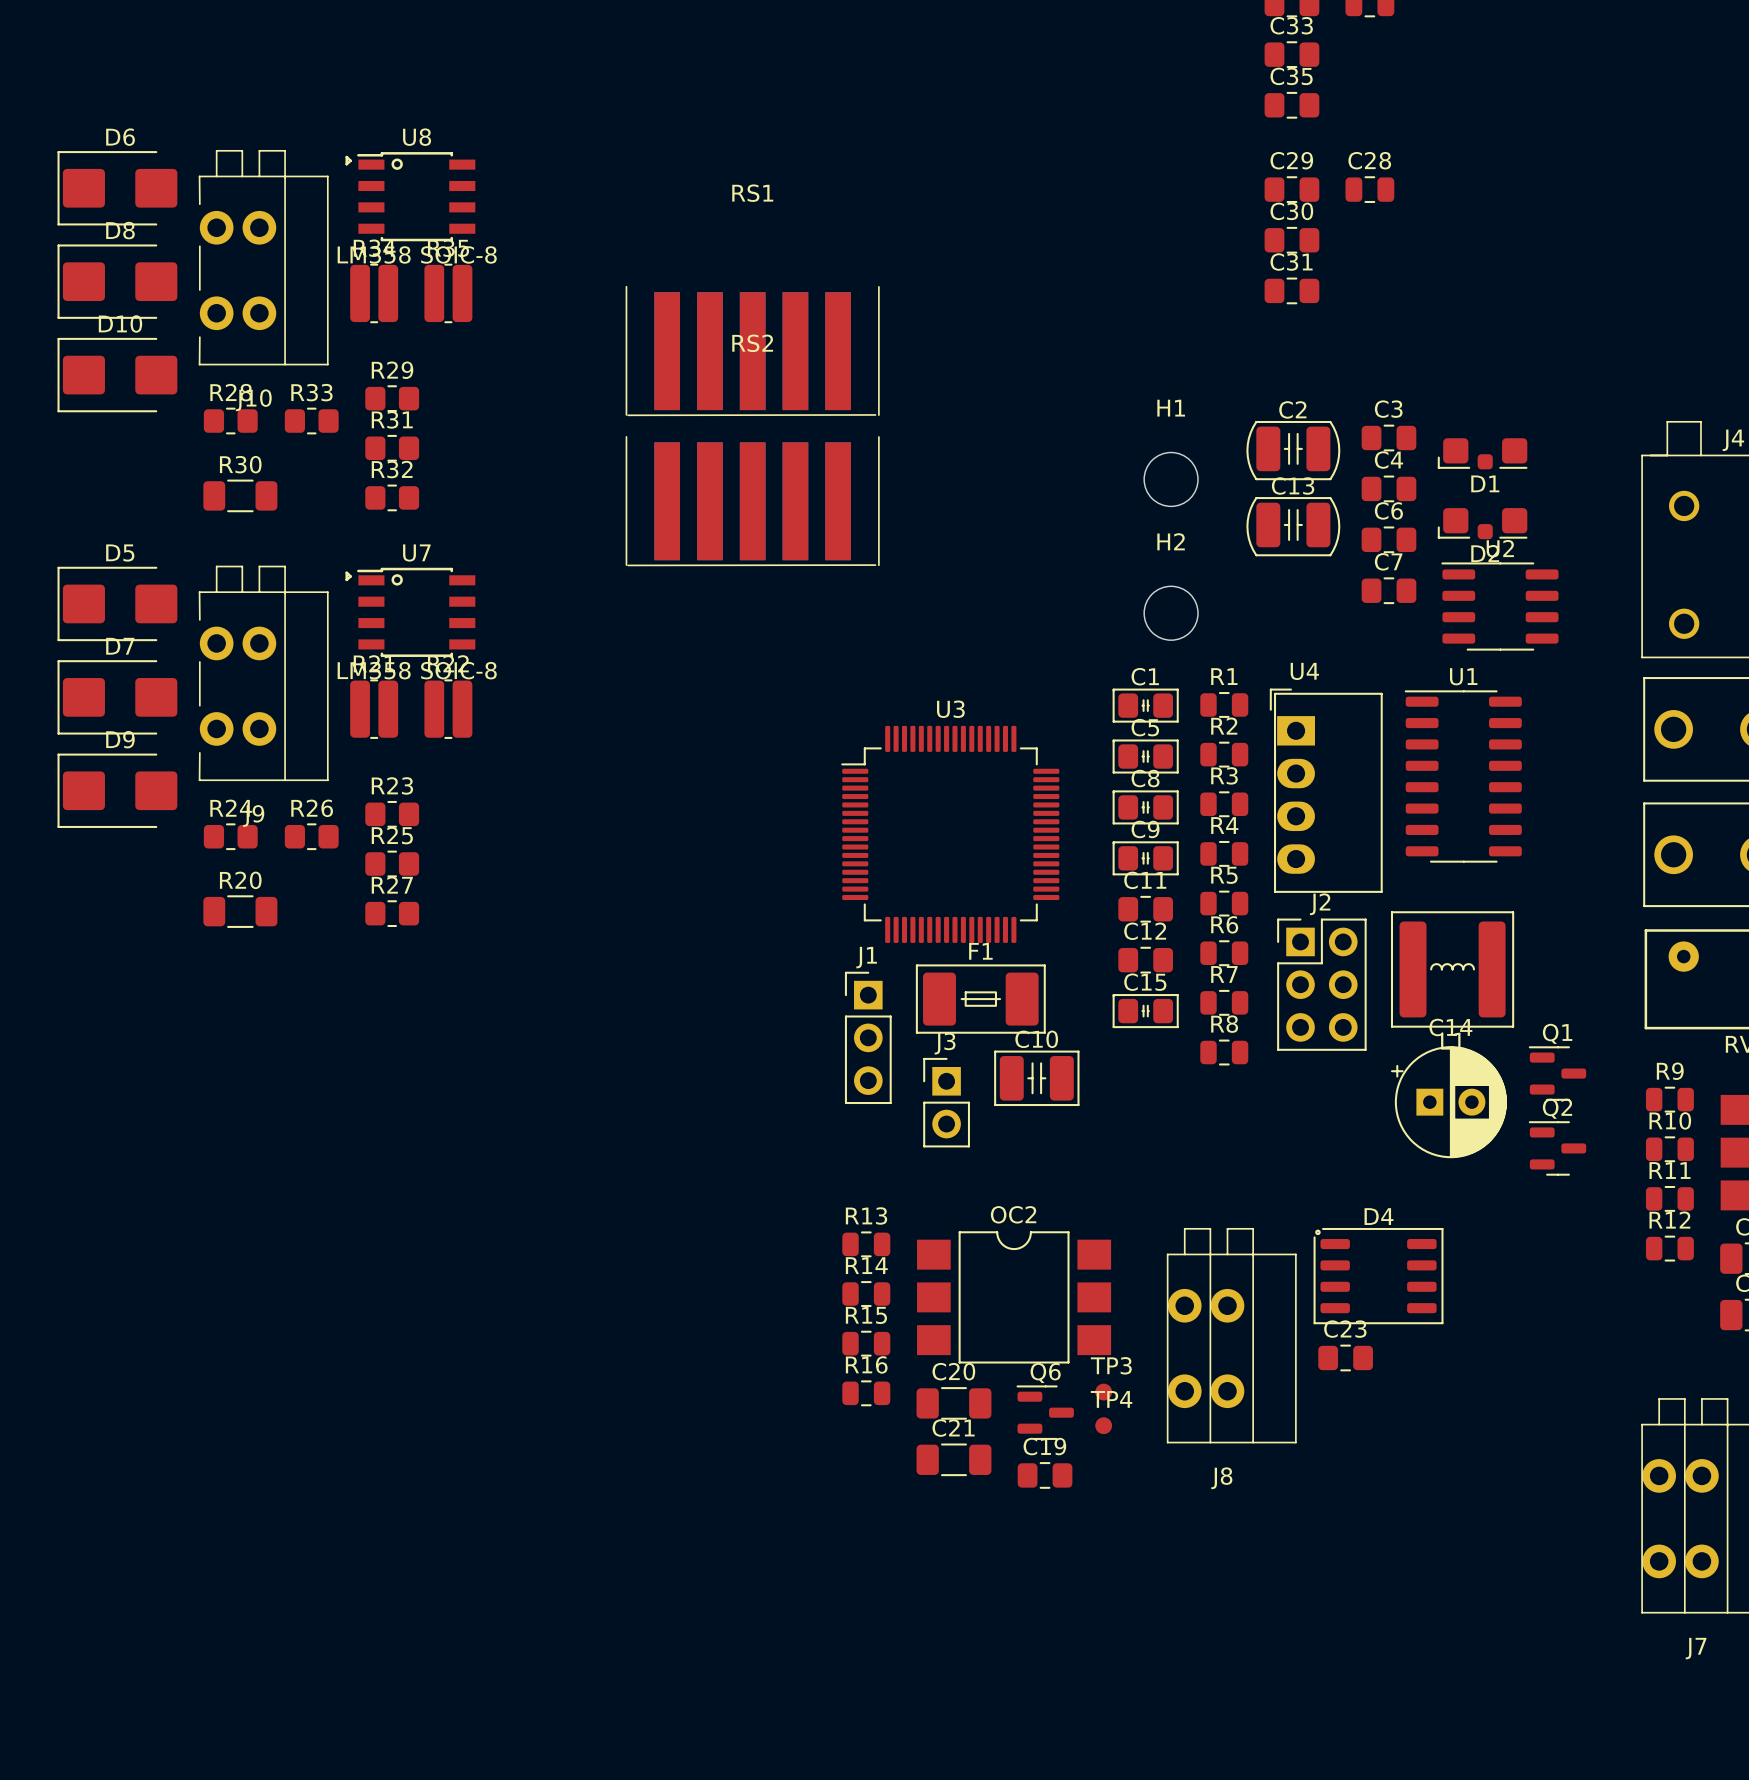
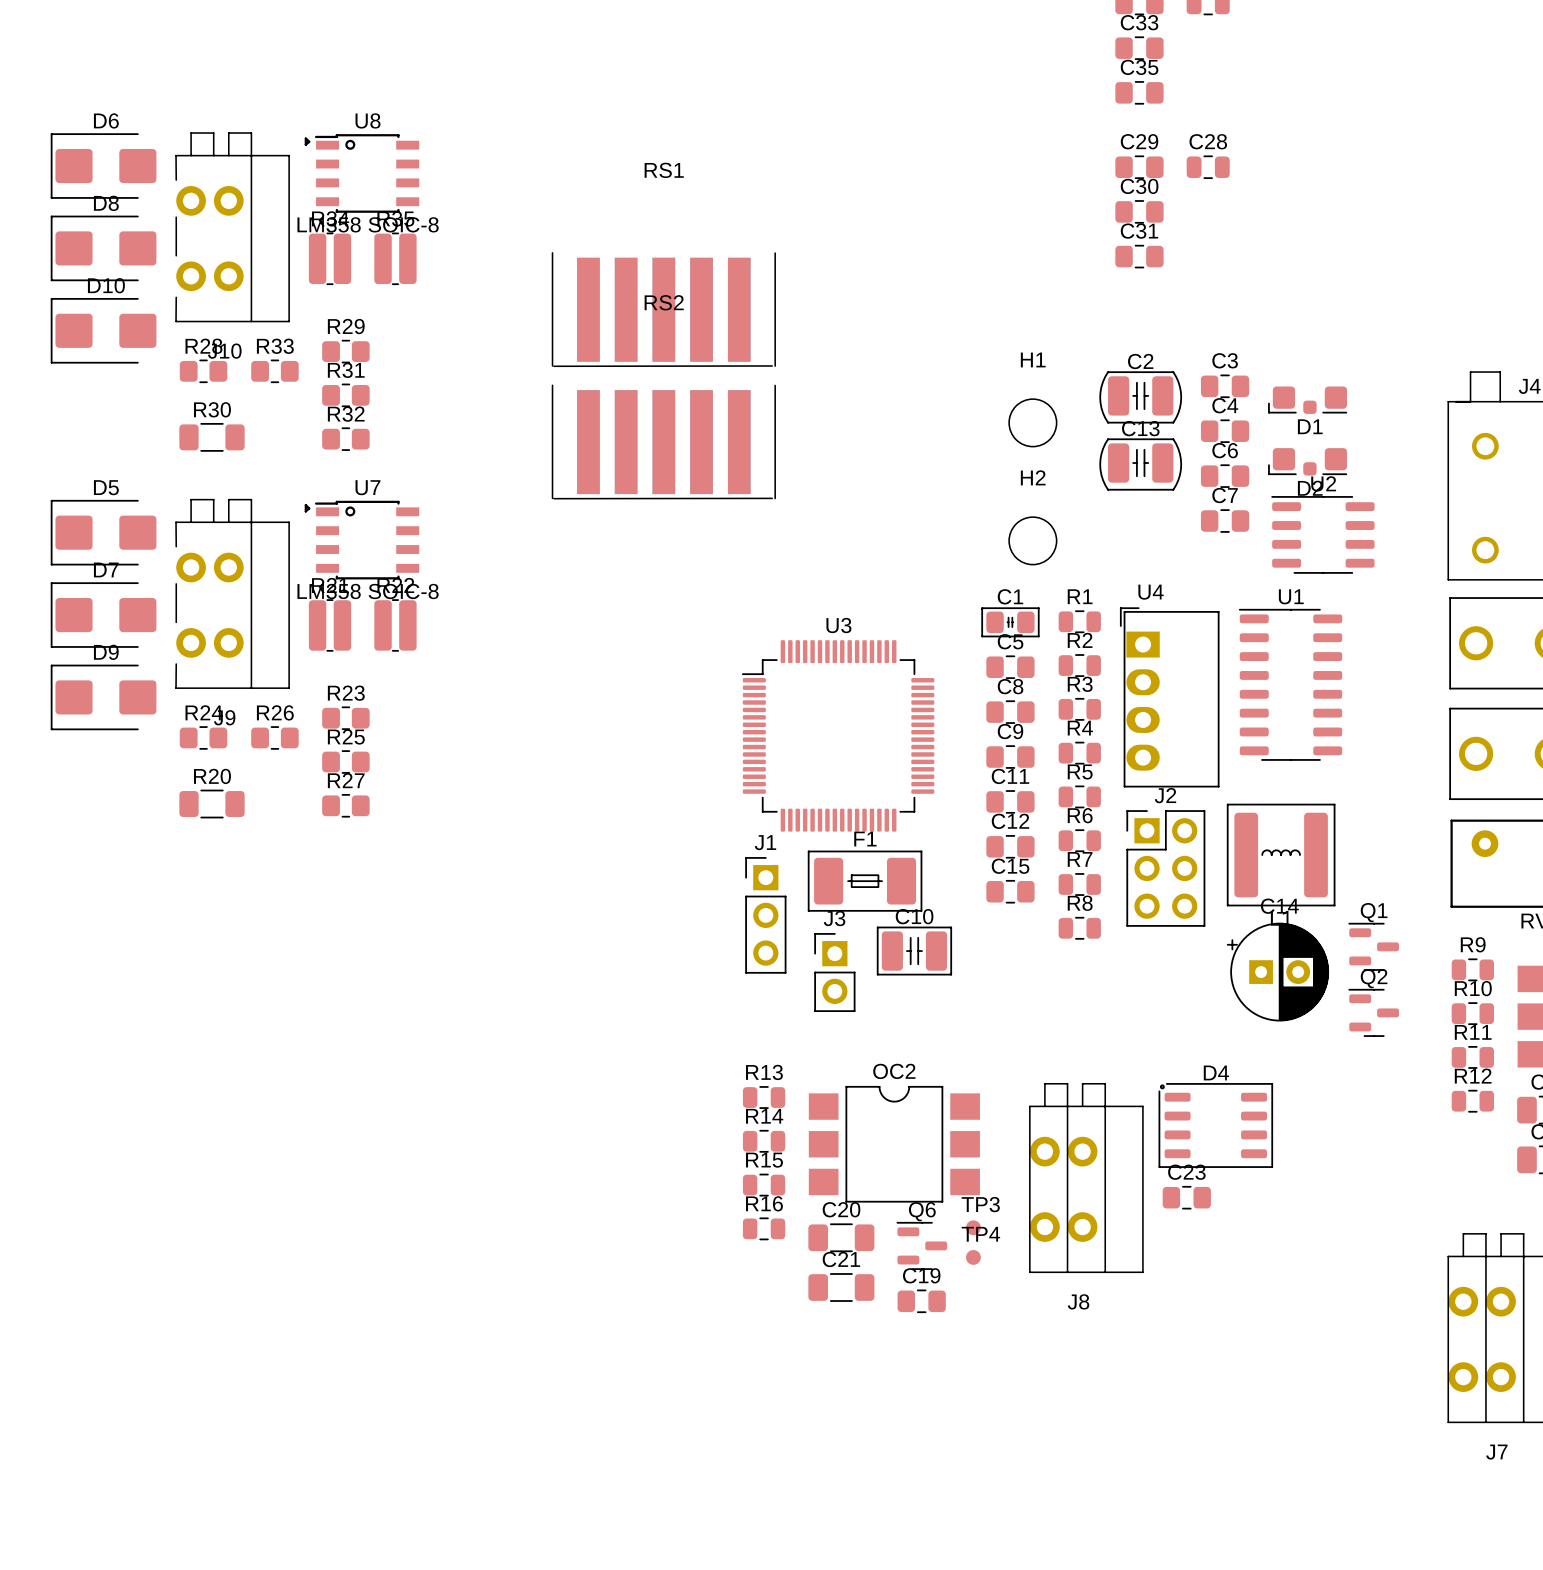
C5 footprint: [1112, 739, 1179, 774] -> [986, 655, 1035, 680]
C8 footprint: [1112, 790, 1179, 825] -> [986, 700, 1035, 724]
C9 footprint: [1112, 841, 1179, 876] -> [986, 745, 1035, 769]
C15 footprint: [1112, 994, 1179, 1029] -> [986, 879, 1035, 904]

